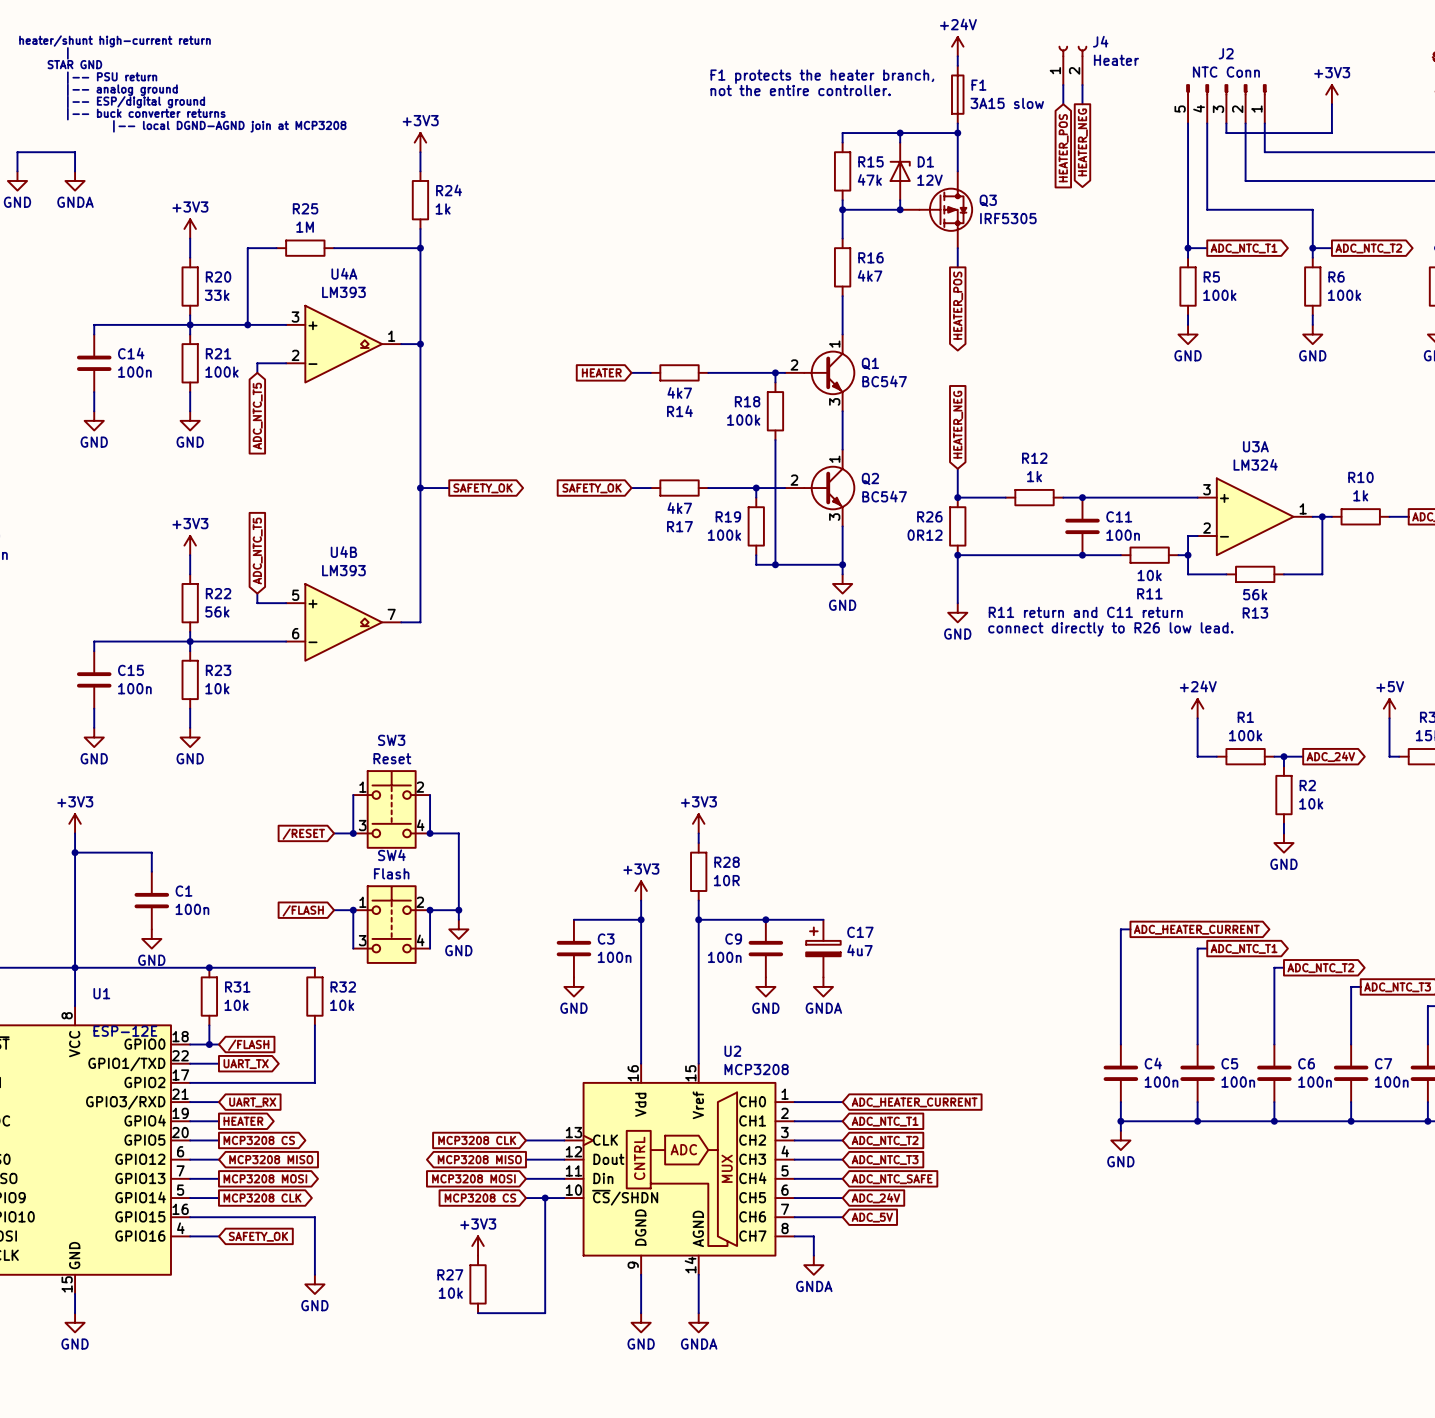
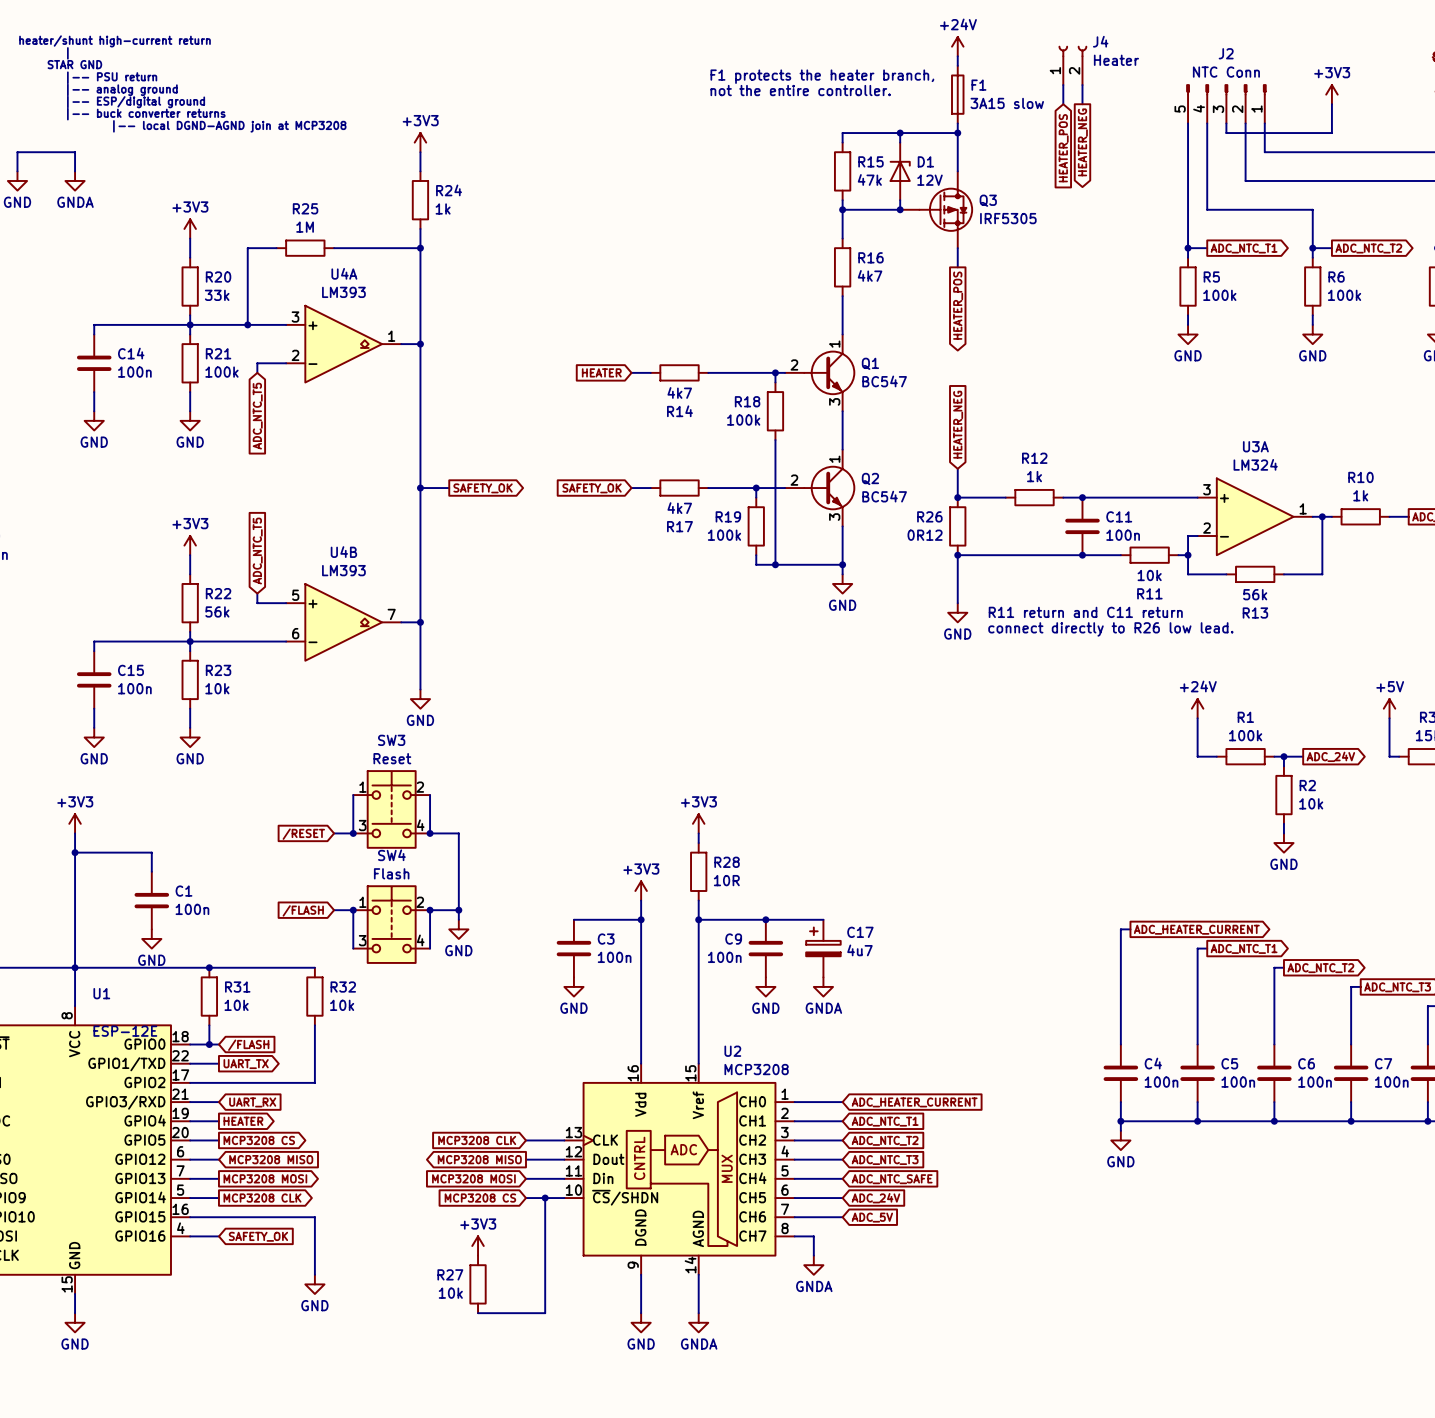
wire: none -> (420, 622) (420, 689)
junction: none -> (420, 622)
power symbol: none -> GND (420, 699)

